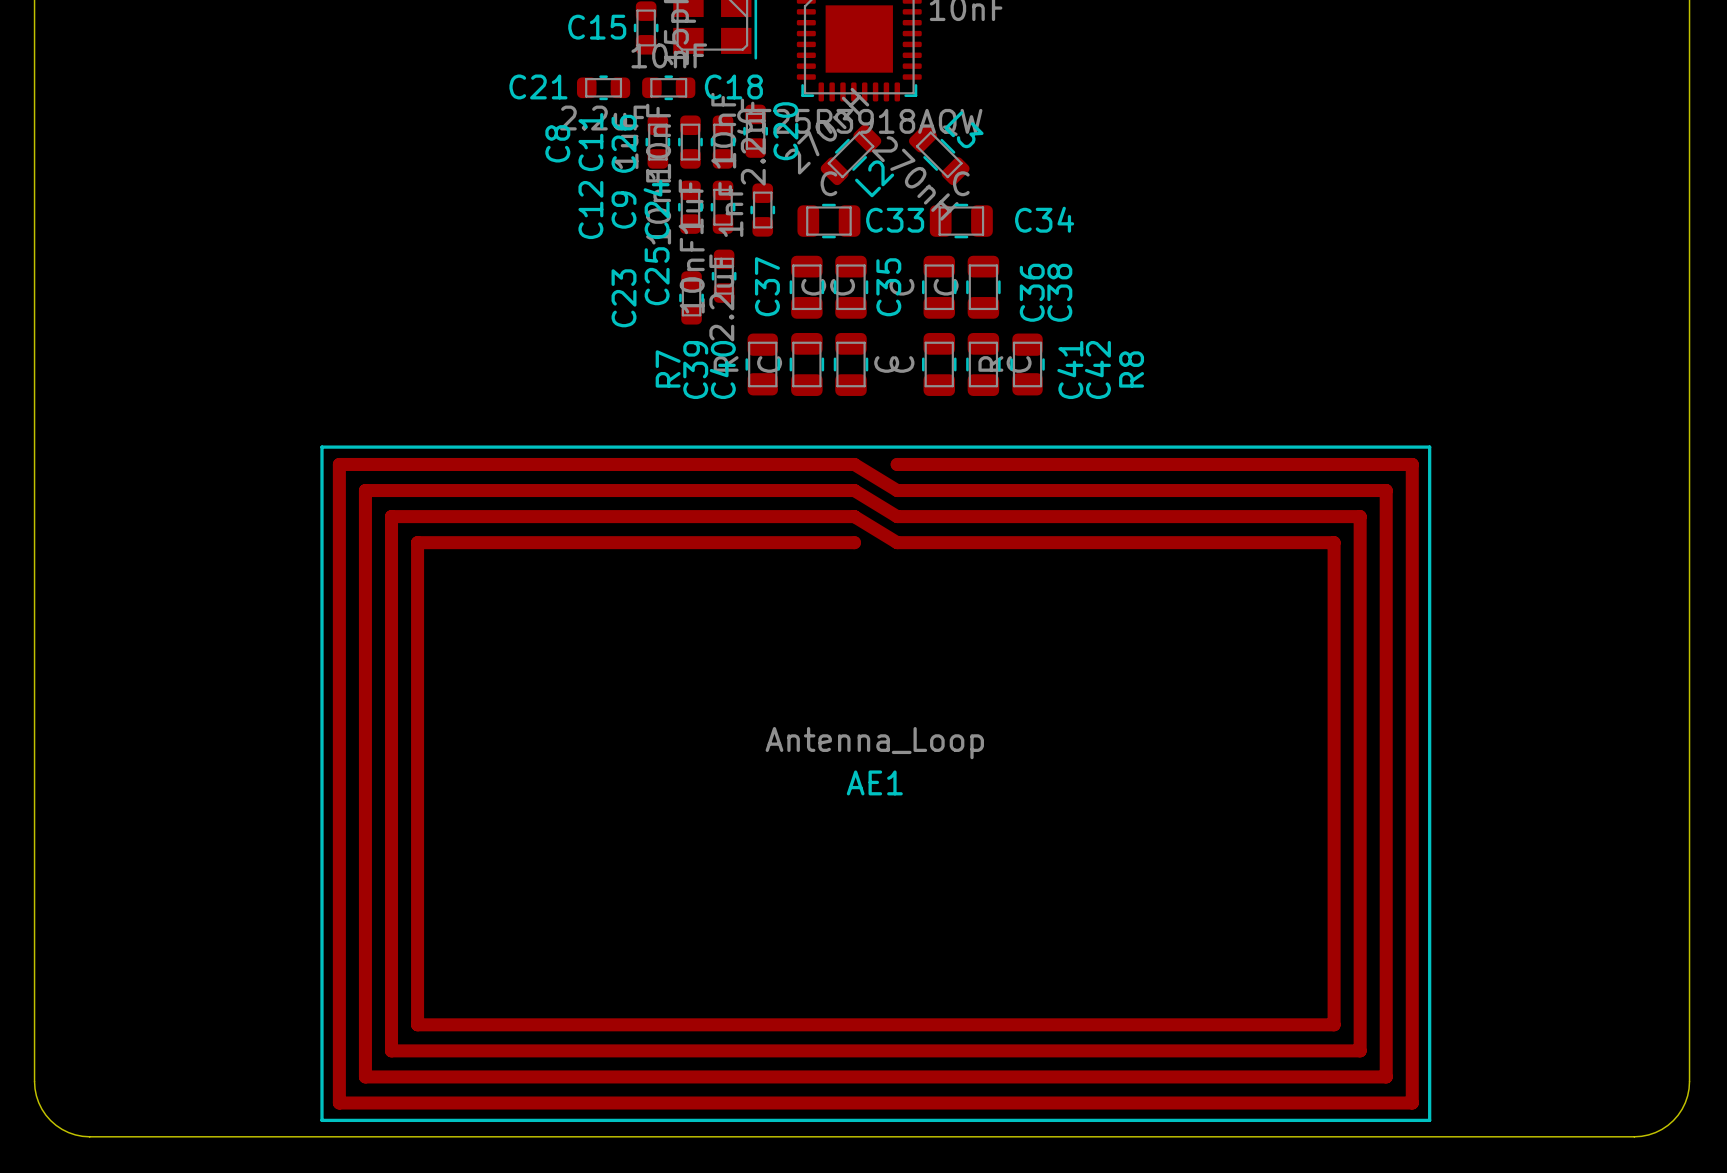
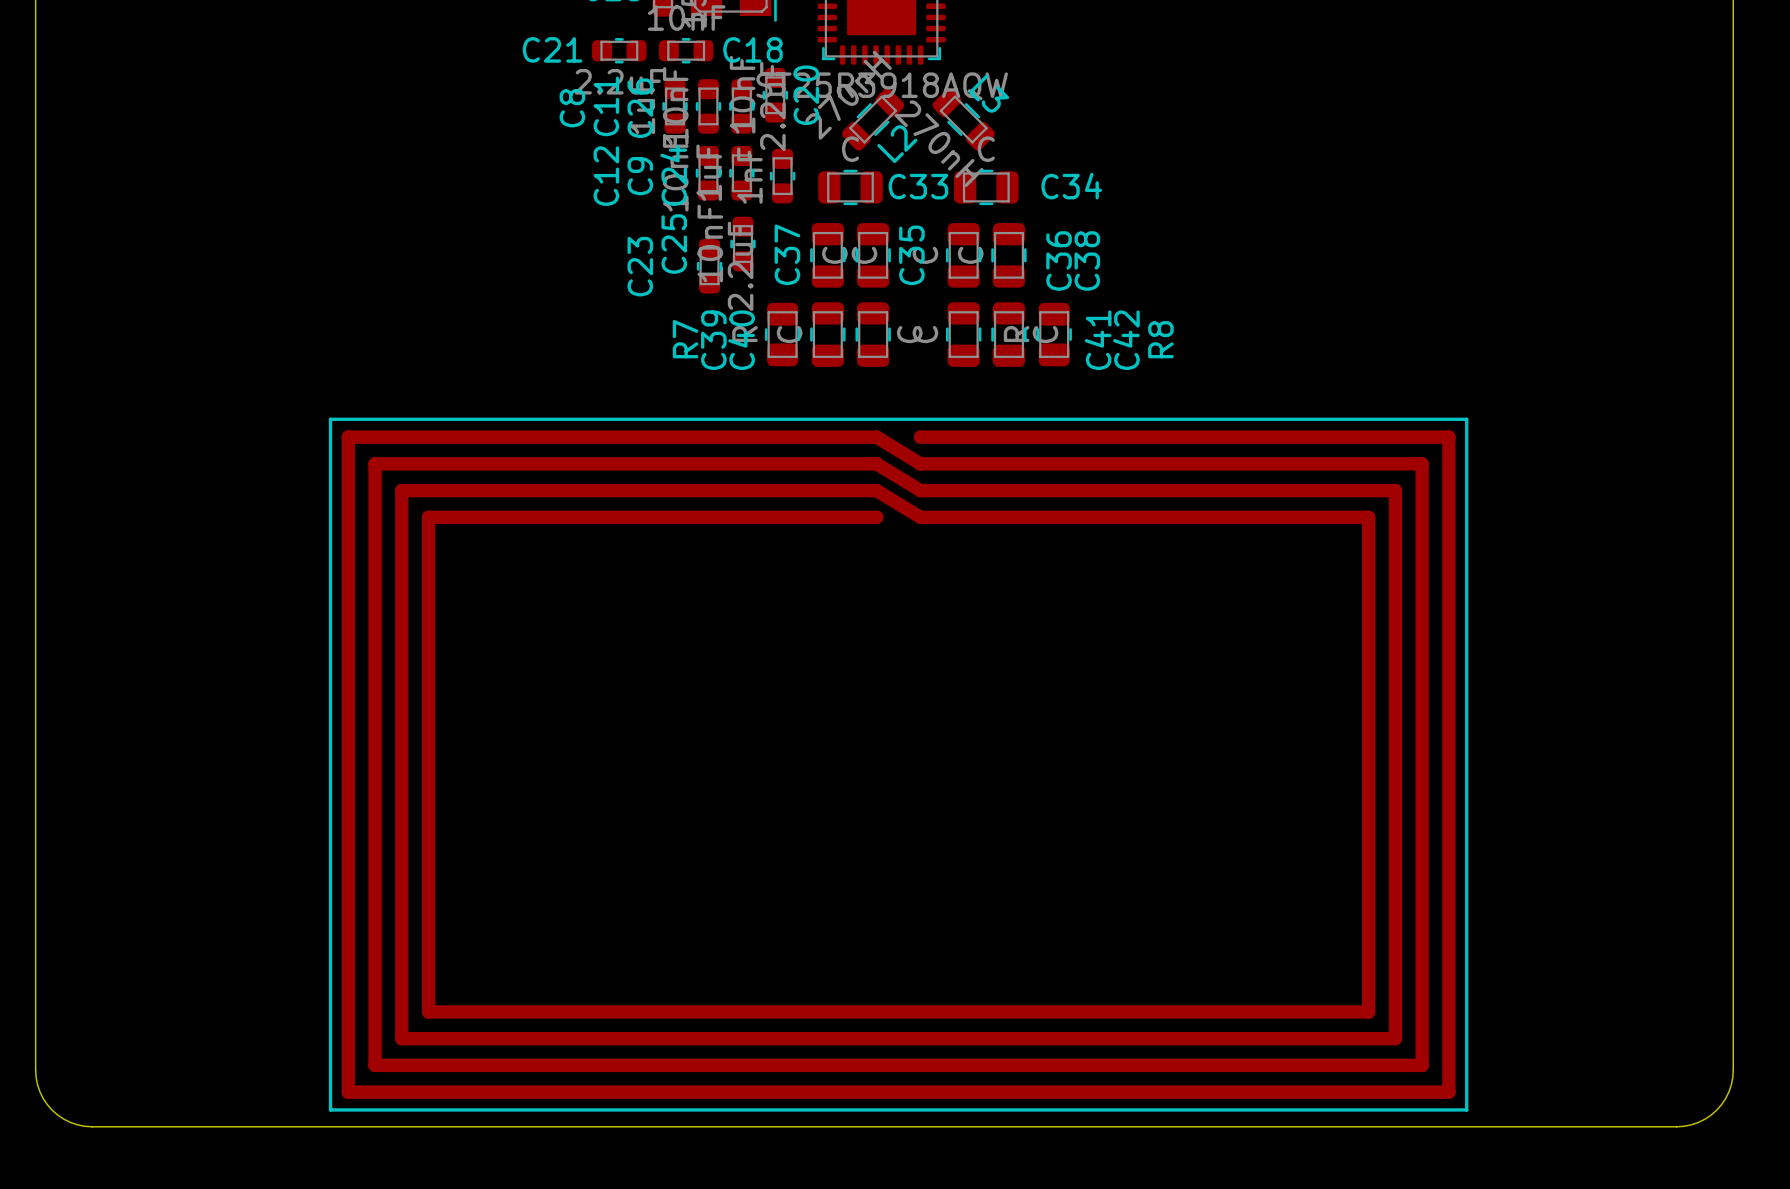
AE1 value: Antenna_Loop (874, 743) -> none
AE1 name: AE1 (874, 782) -> none

